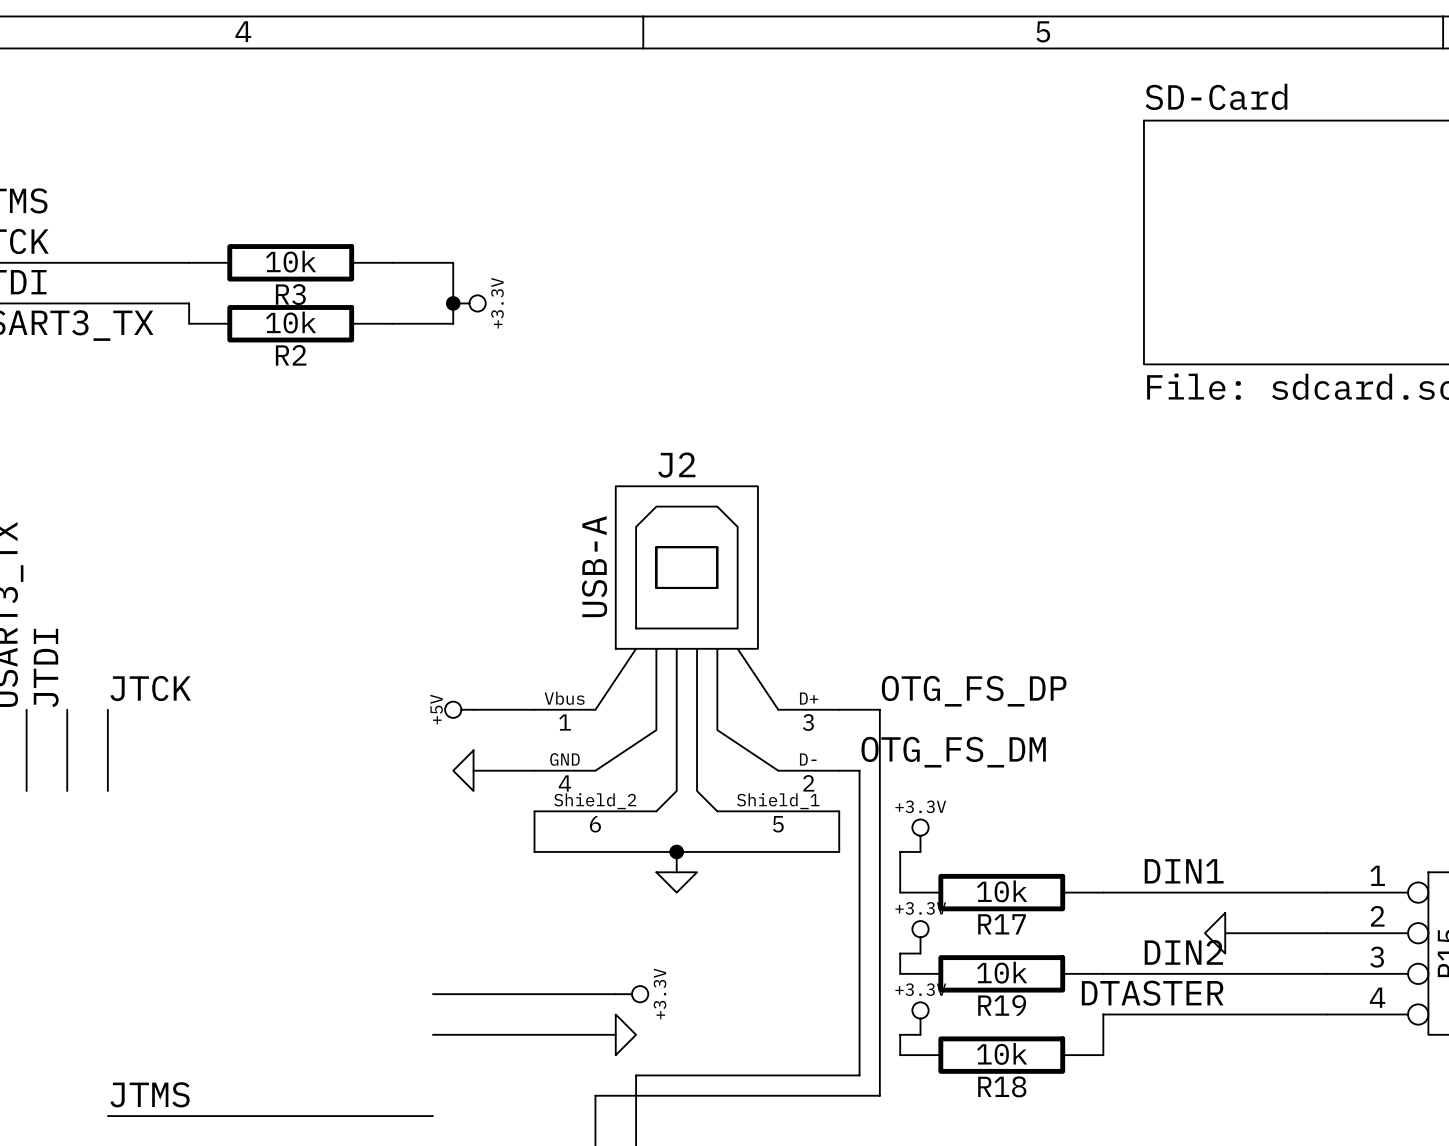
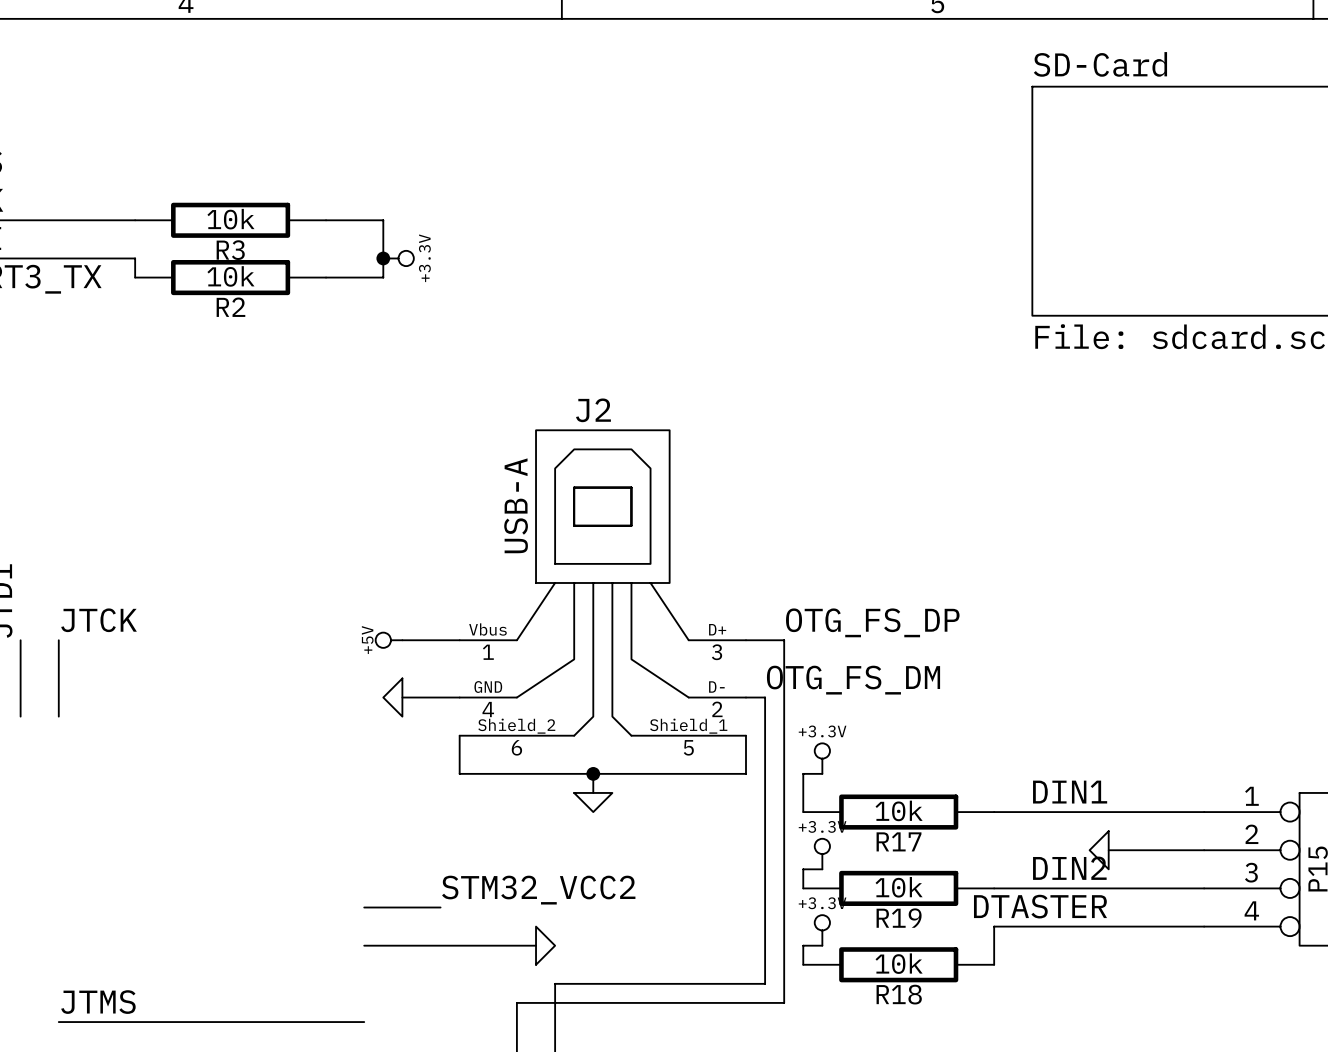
label: none -> STM32_VCC2 (538, 890)
wire: (514, 994) (615, 994) -> none
power symbol: +3.3V (632, 994) -> none

